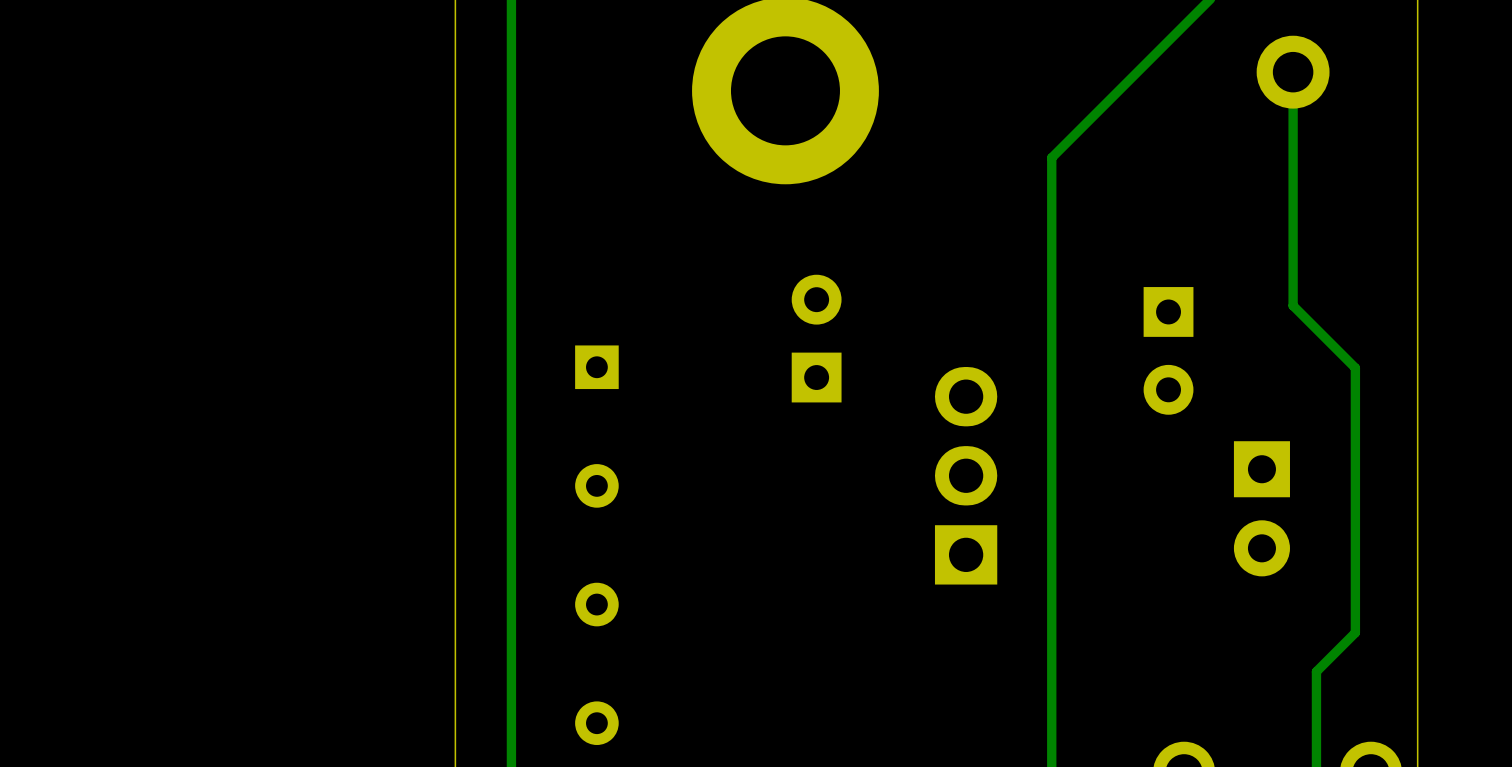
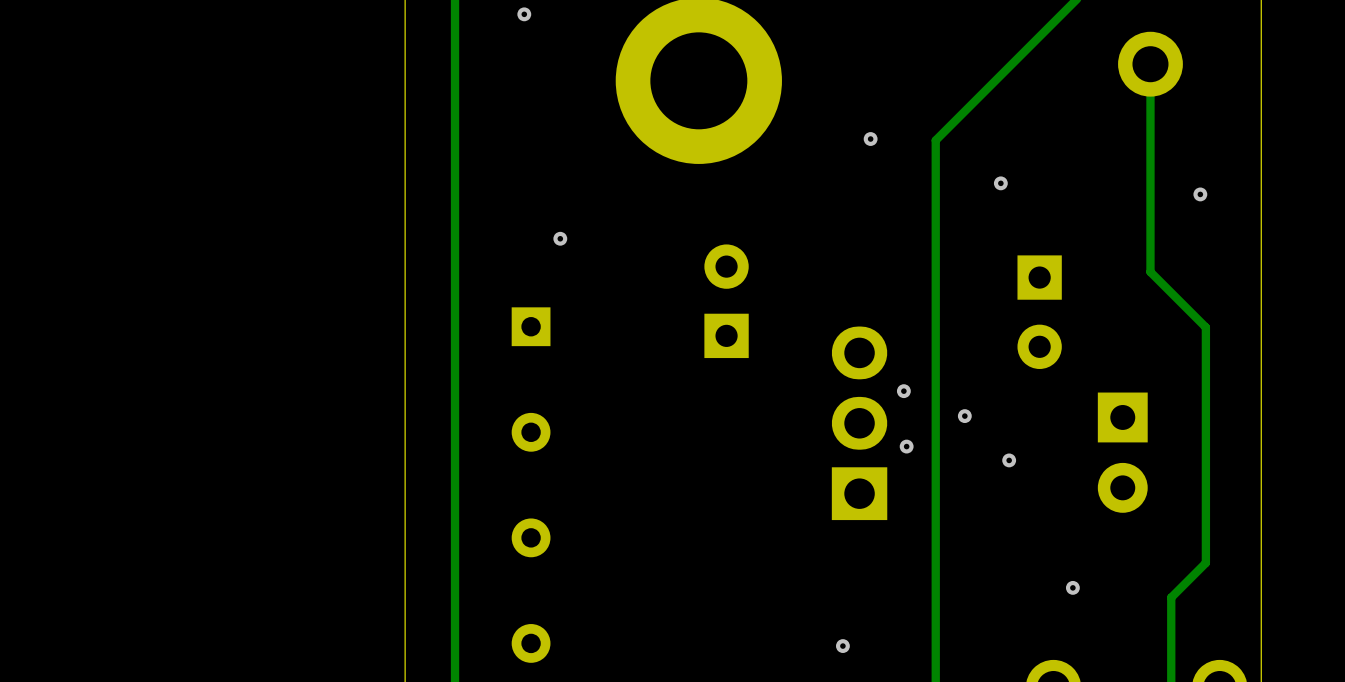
via: none -> (524, 14)
via: none -> (870, 139)
via: none -> (1000, 183)
via: none -> (1200, 194)
via: none -> (560, 238)
via: none -> (903, 391)
via: none -> (964, 416)
via: none -> (906, 446)
via: none -> (1009, 460)
via: none -> (1072, 587)
via: none -> (842, 646)

